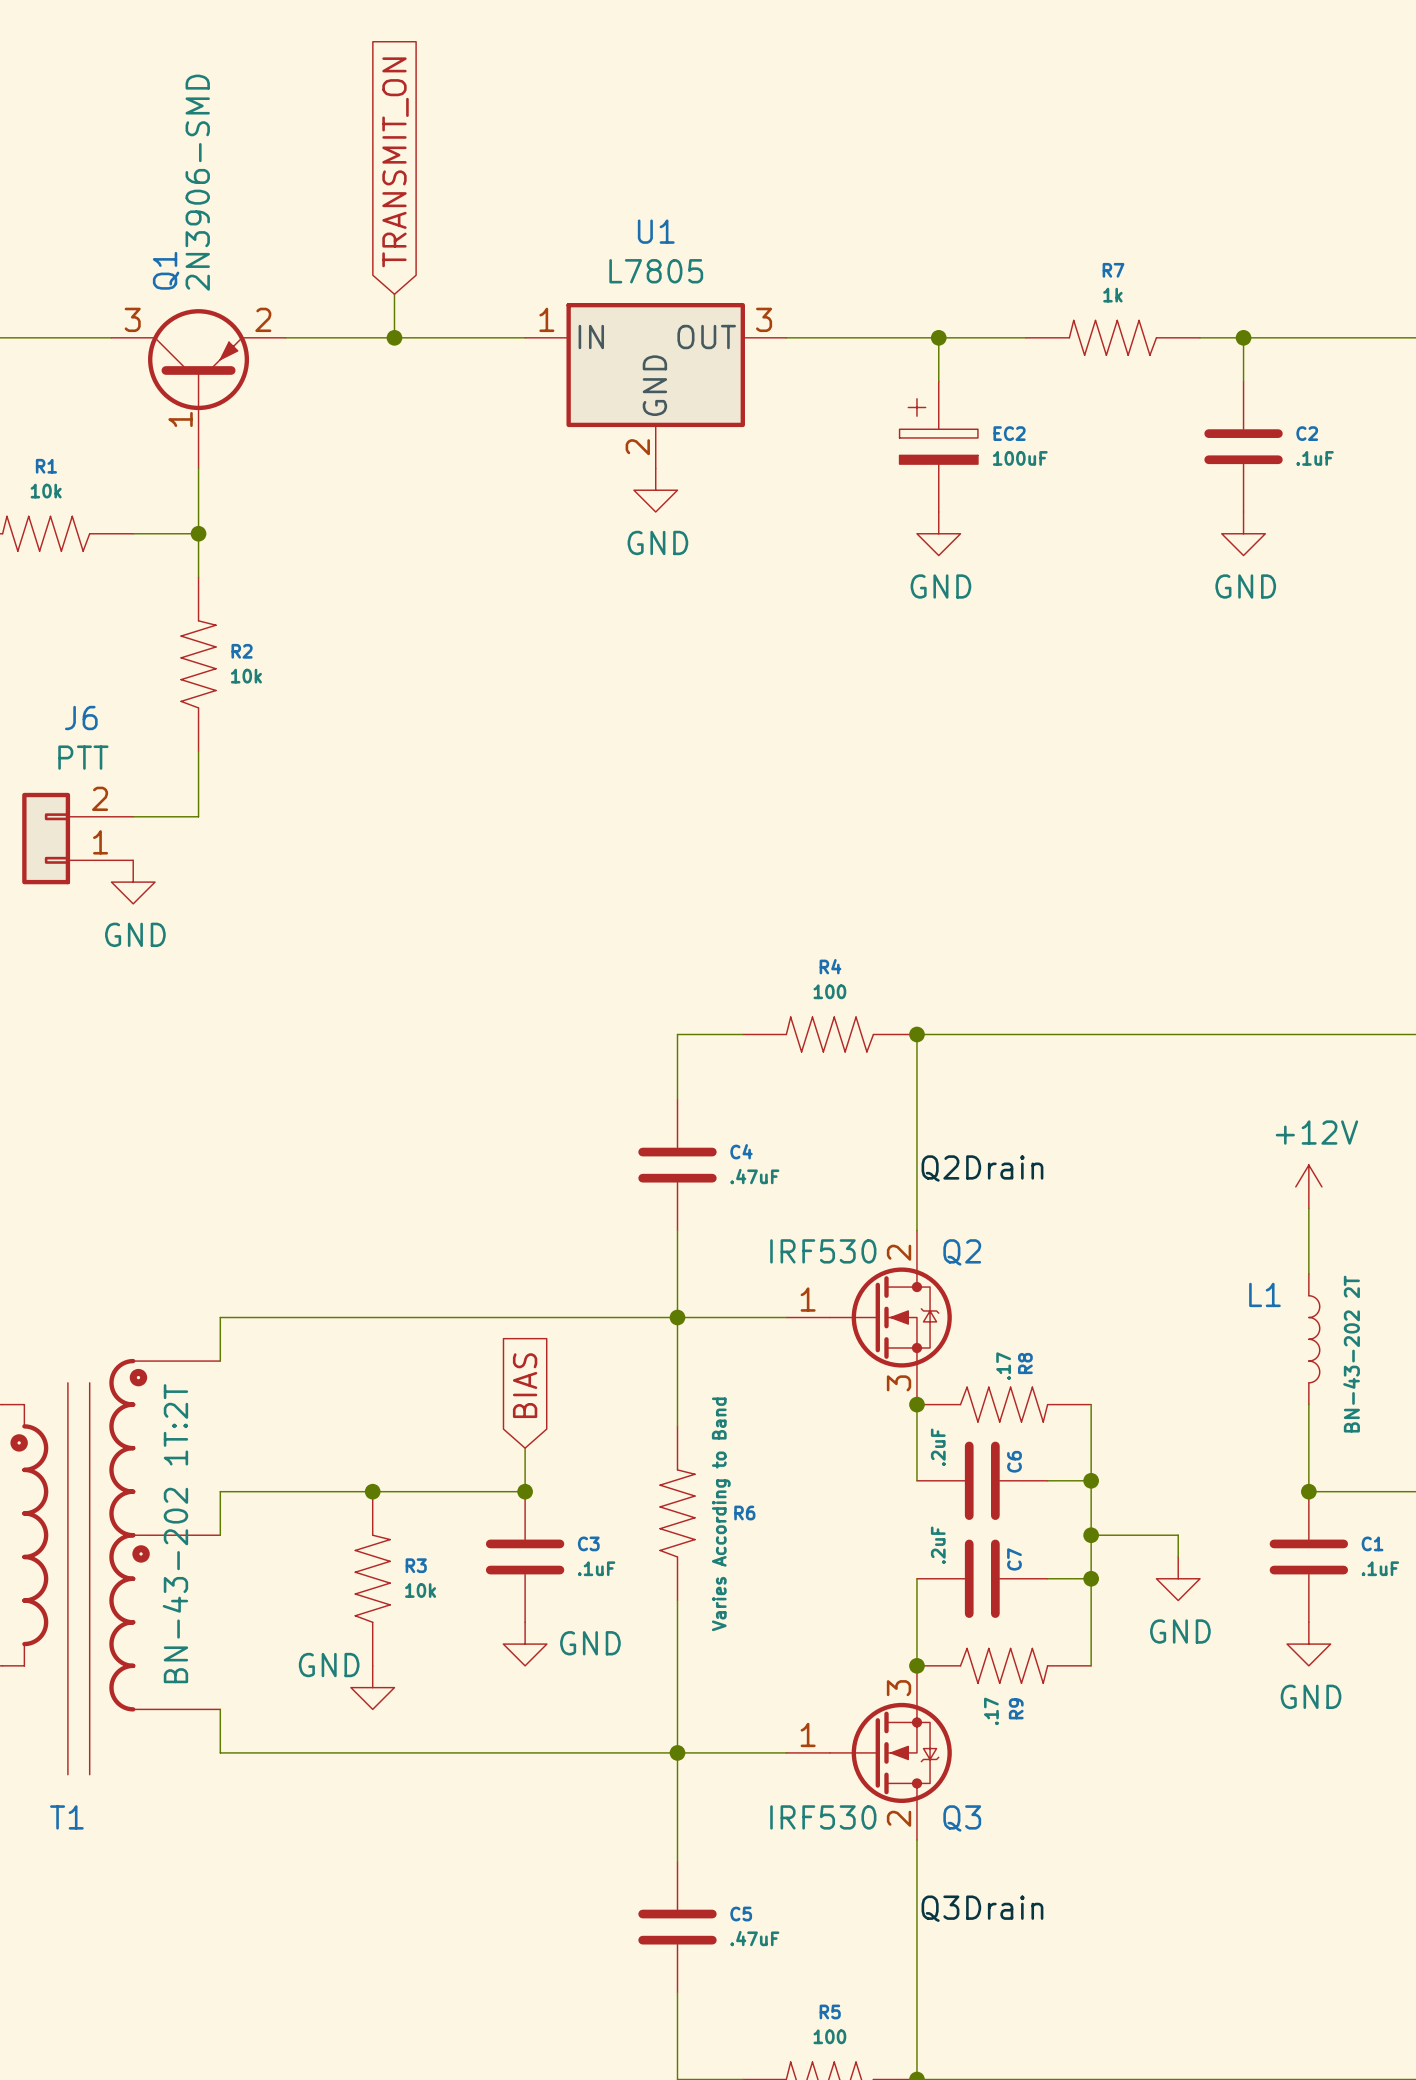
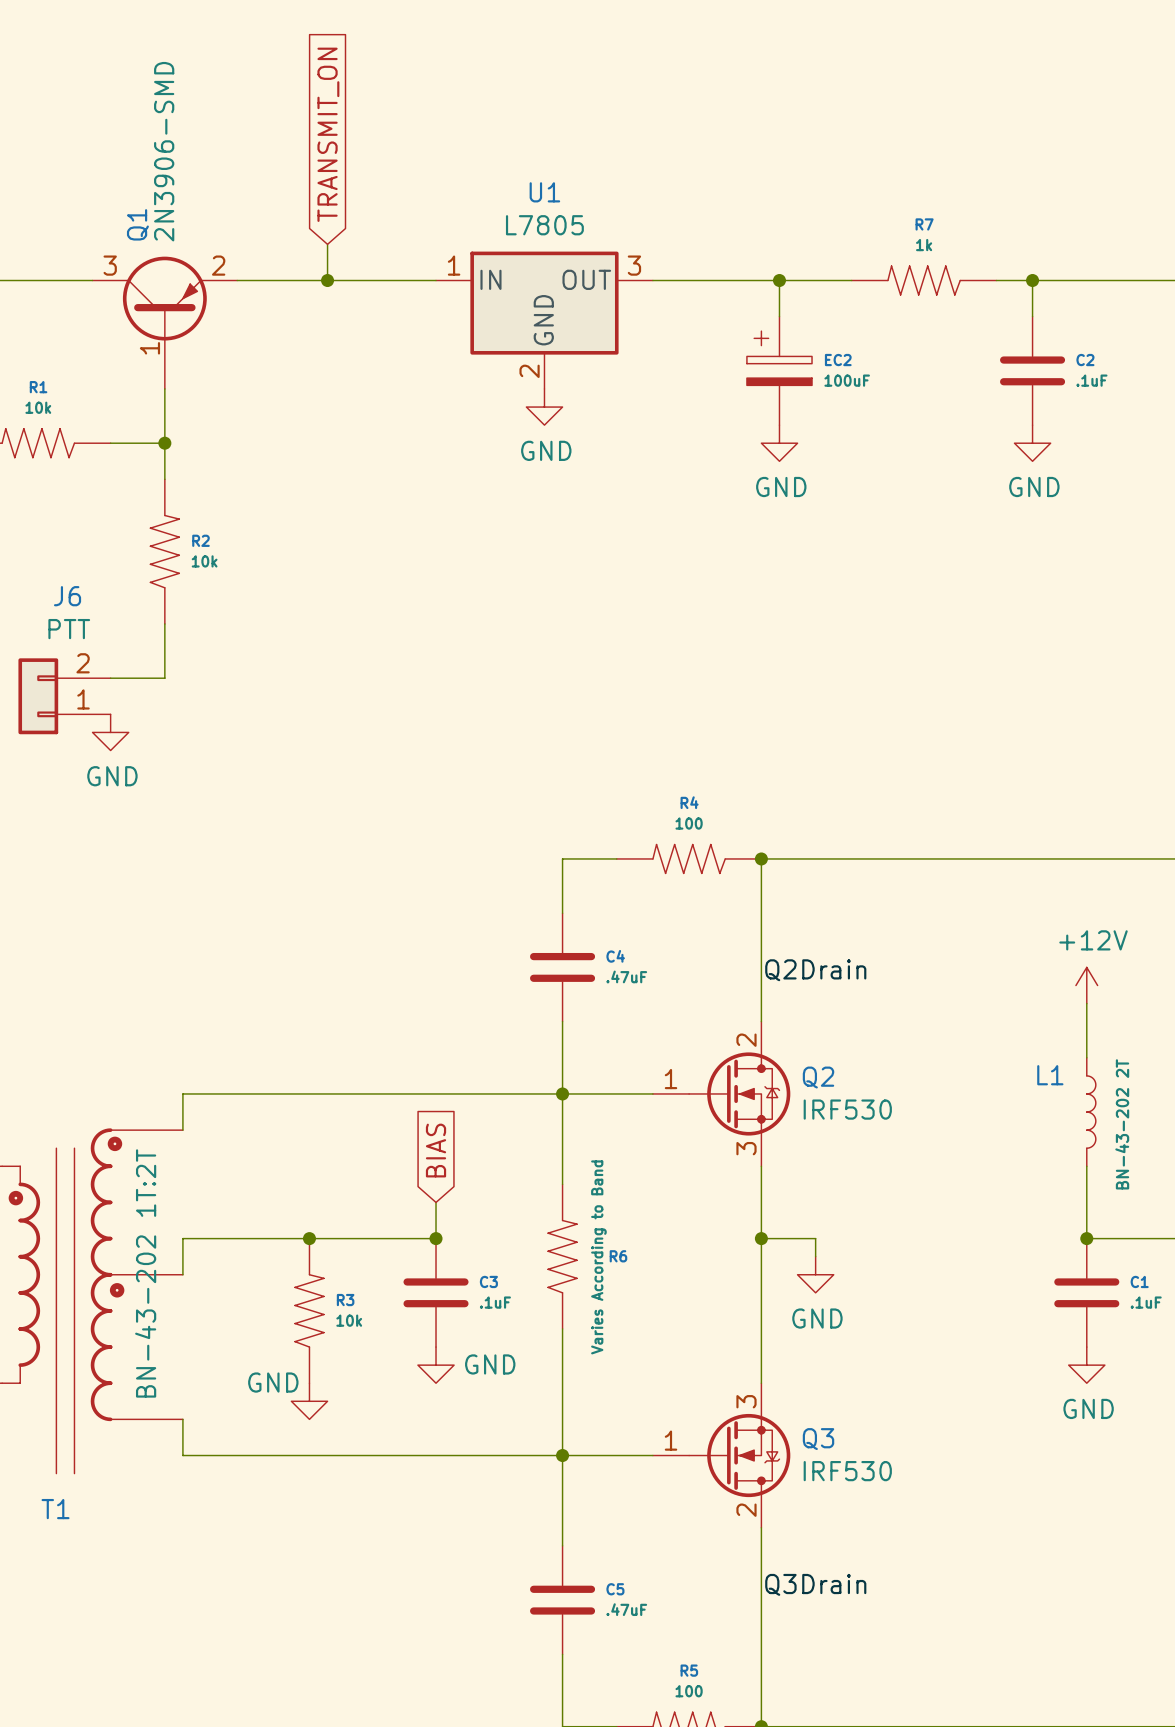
Q2 value position: IRF530 (823, 1251) -> IRF530 (847, 1109)
Q2 name position: Q2 (962, 1252) -> Q2 (818, 1077)
junction: (916, 1404) -> none
R8: .17 (1004, 1404) -> none
wire: (1091, 1404) (1091, 1665) -> none
wire: none -> (761, 1229) (761, 1310)
C6: .2uF (982, 1480) -> none
wire: (1047, 1480) (1091, 1480) -> none
junction: (1091, 1480) -> none
wire: none -> (761, 1238) (815, 1238) (815, 1256)
junction: none -> (761, 1238)
wire: (1091, 1535) (1178, 1535) (1178, 1557) -> none
junction: (1091, 1535) -> none
C7: .2uF (982, 1578) -> none
wire: (1047, 1578) (1091, 1578) -> none
junction: (1091, 1578) -> none
power symbol position: GND (1178, 1578) -> GND (815, 1274)
junction: (916, 1665) -> none
R9: .17 (1004, 1665) -> none
Q3 value position: IRF530 (823, 1817) -> IRF530 (847, 1471)
Q3 name position: Q3 (962, 1818) -> Q3 (818, 1439)

